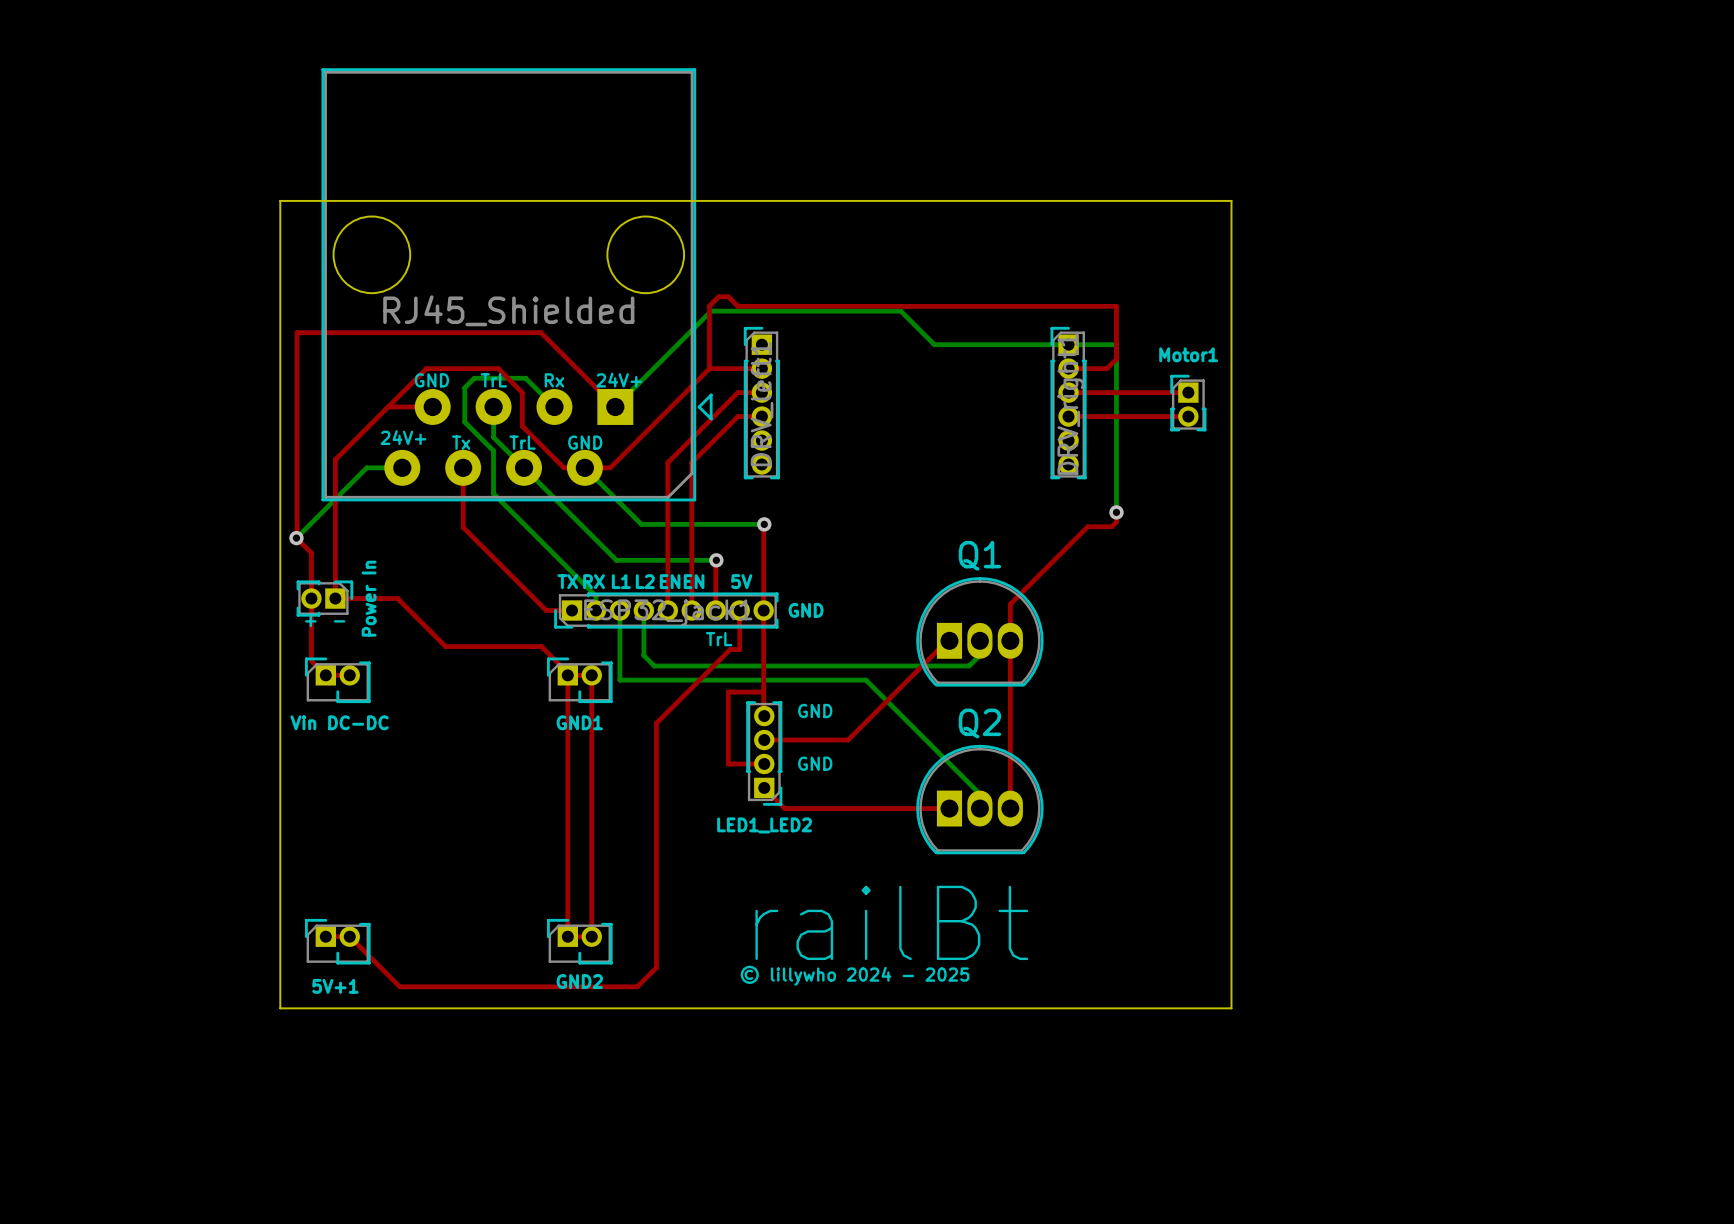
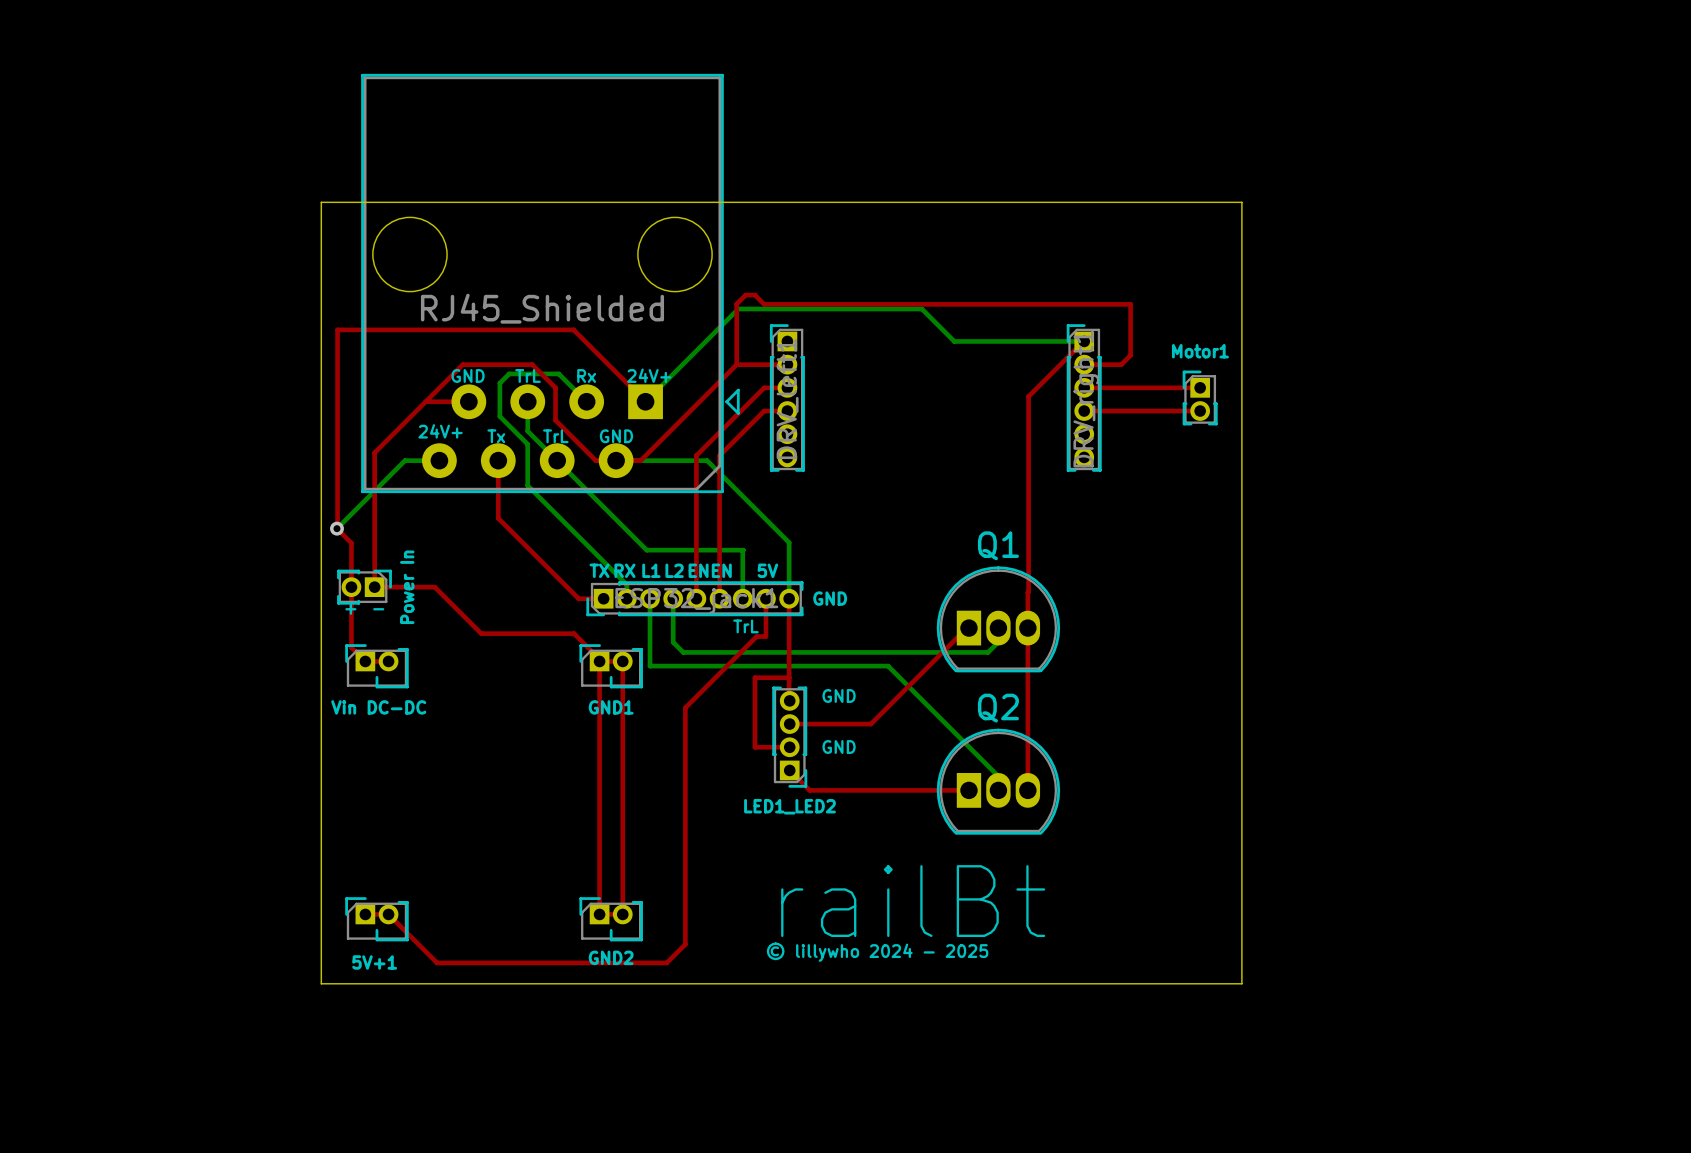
bottom track: (1068, 344) (1116, 344) (1116, 512) -> none
bottom track: (584, 467) (641, 524) (764, 524) -> (616, 460) (707, 460) (789, 542) (789, 598)
top track: (1116, 512) (1116, 521) (1111, 526) (1087, 526) (1011, 603) -> (1084, 341) (1028, 396) (1028, 591)
via: (1116, 512) -> none
top track: (764, 524) (763, 610) -> none
via: (764, 524) -> none
top track: (716, 560) (715, 610) -> none
bottom track: none -> (743, 550) (742, 598)
via: (716, 560) -> none

